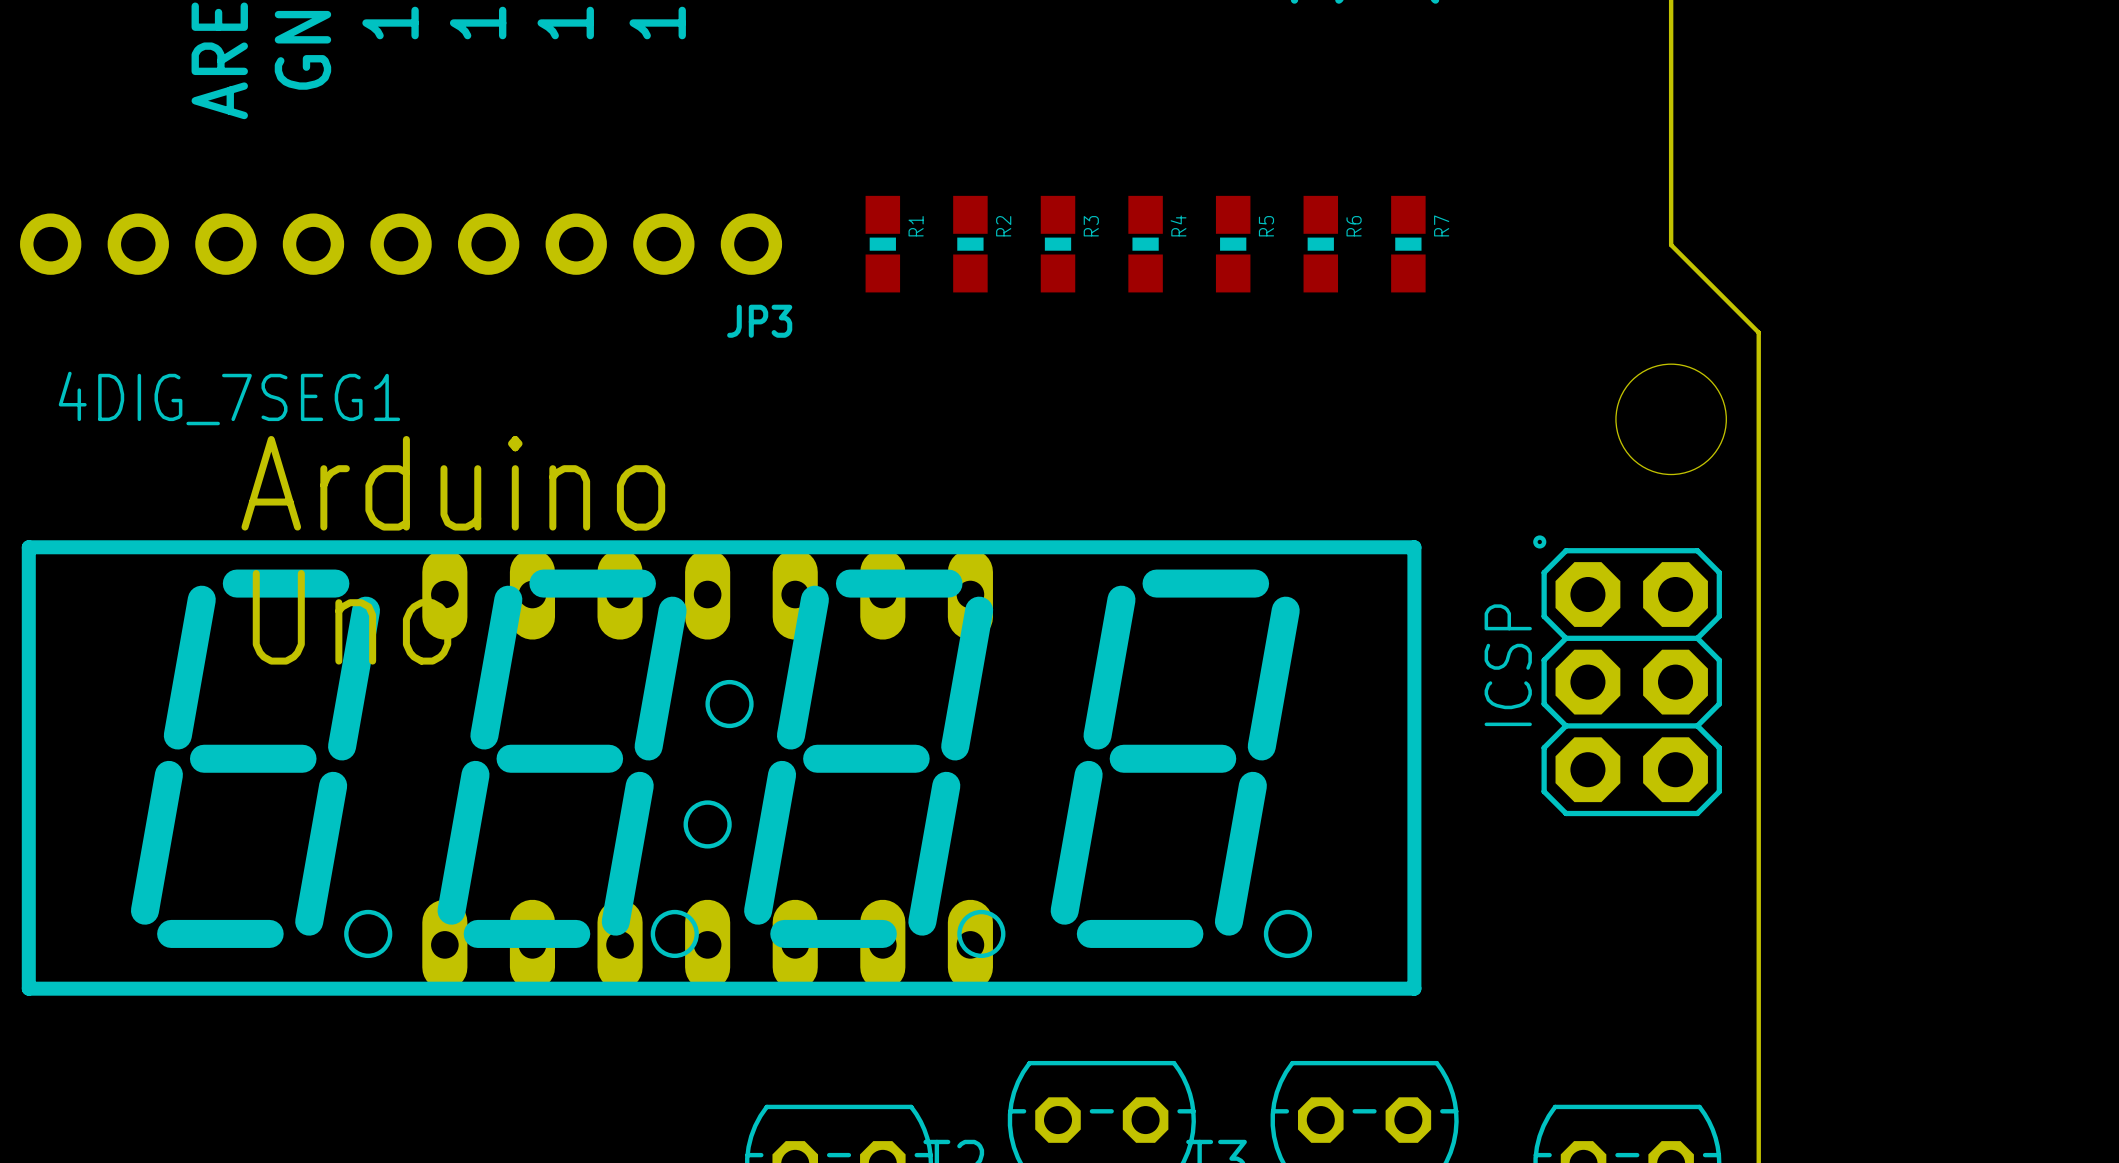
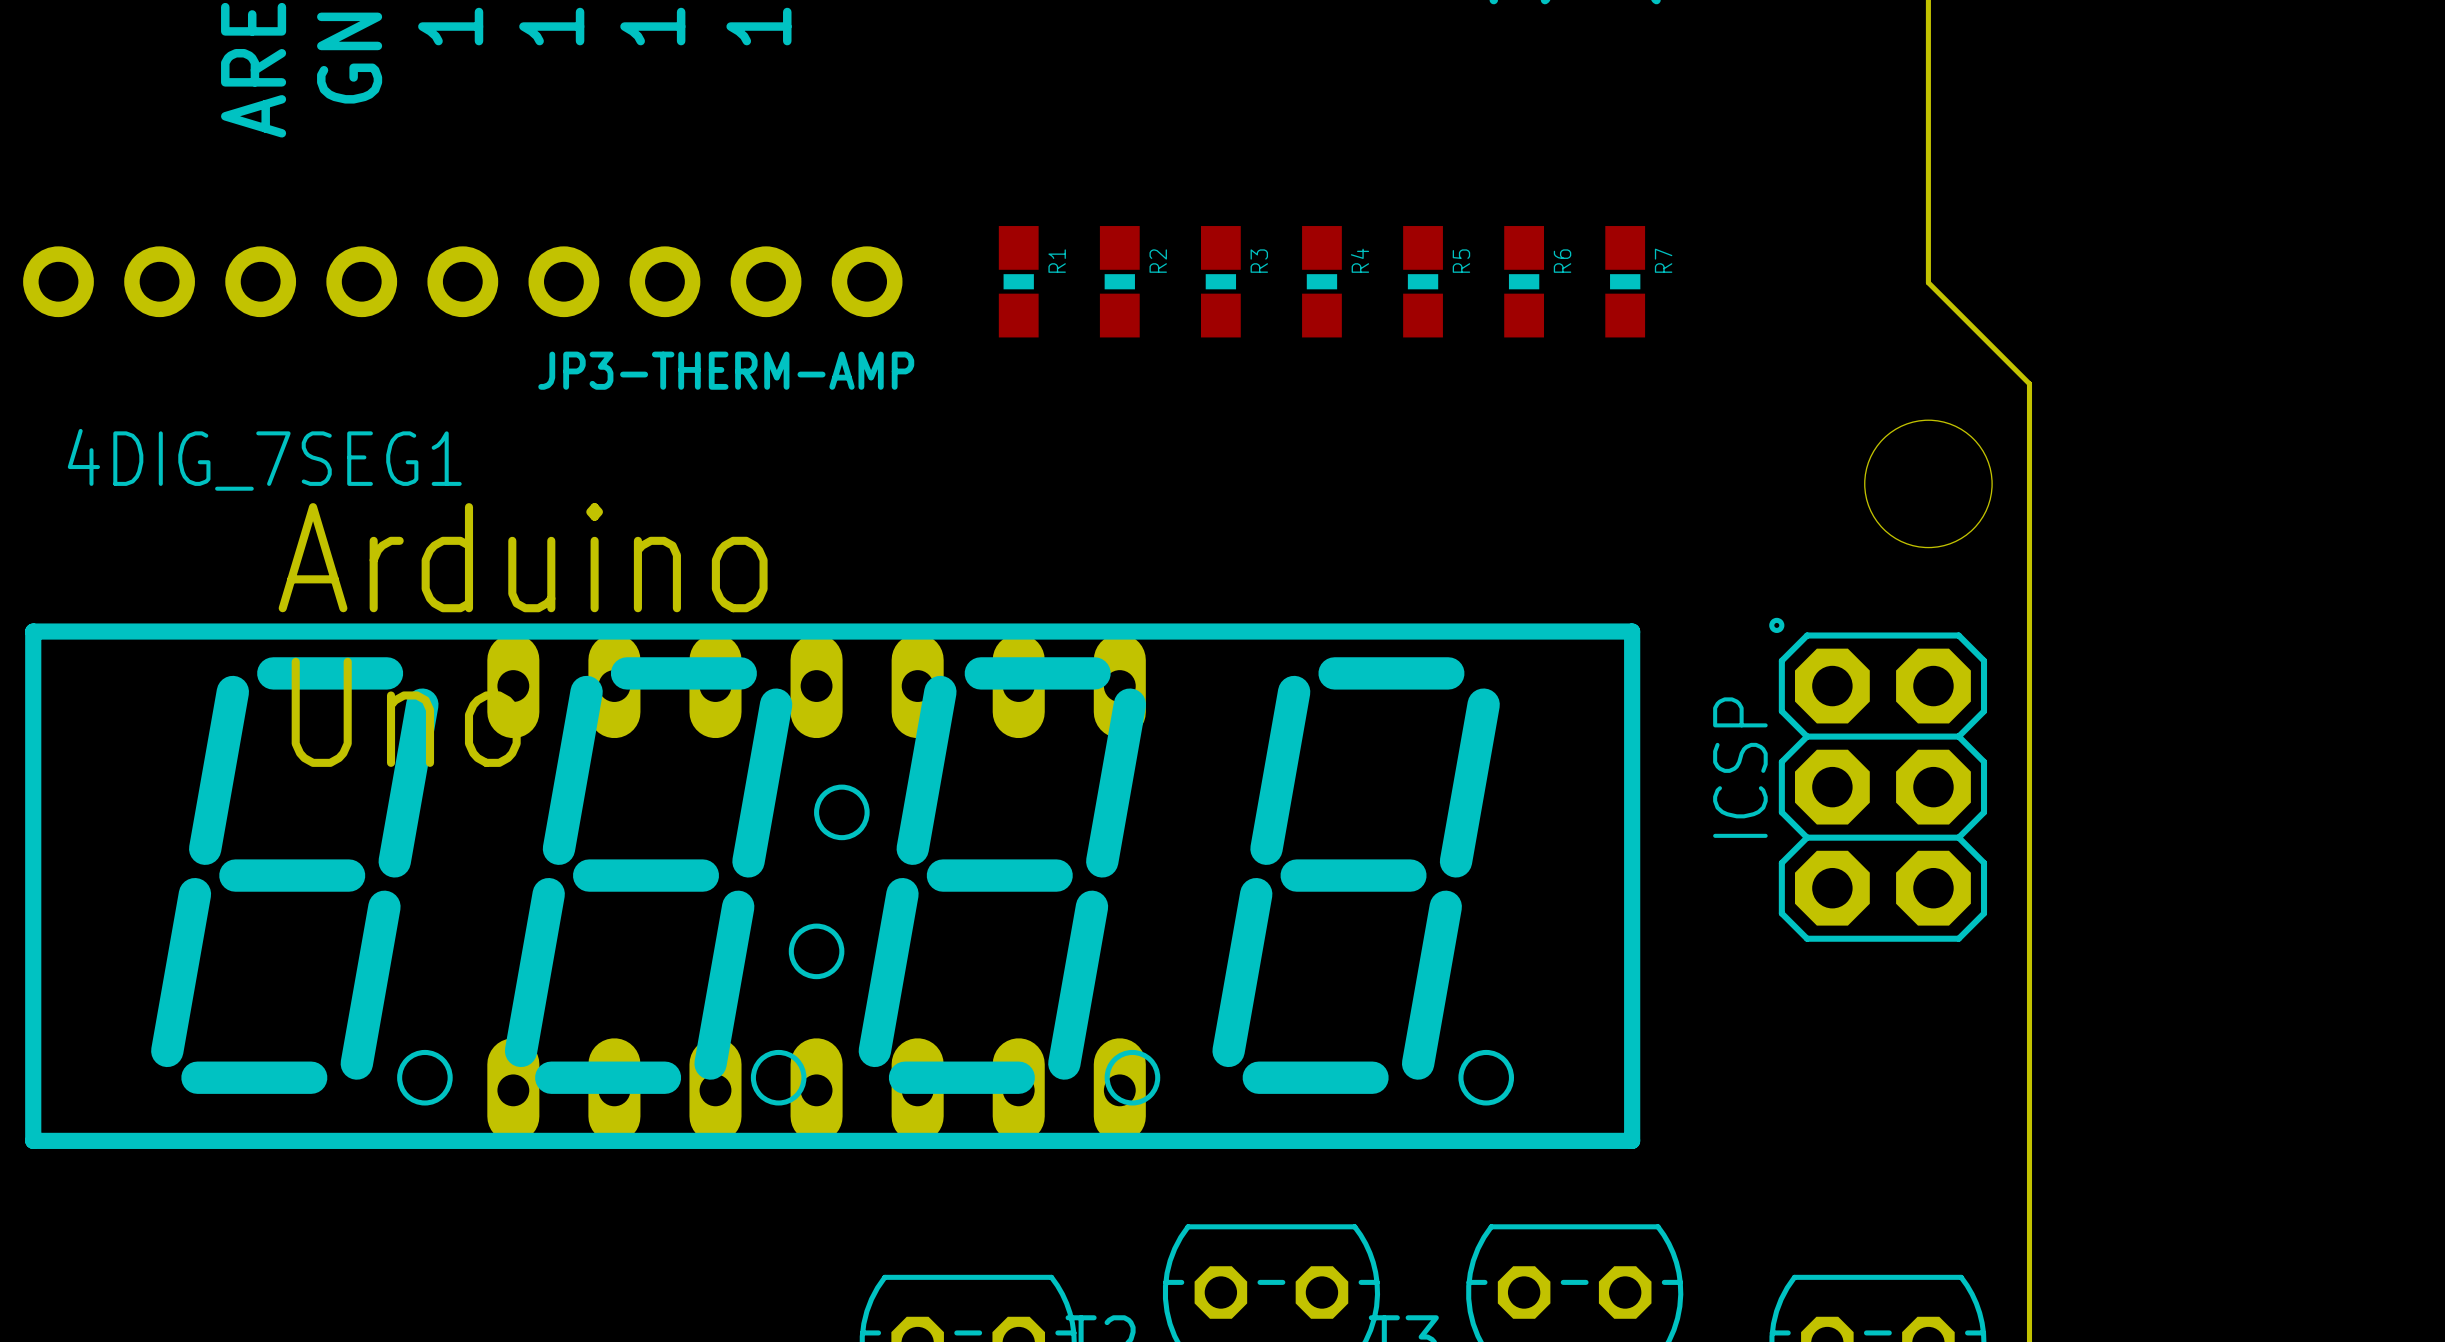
JP3 name: JP3 (759, 321) -> JP3-THERM-AMP (726, 370)

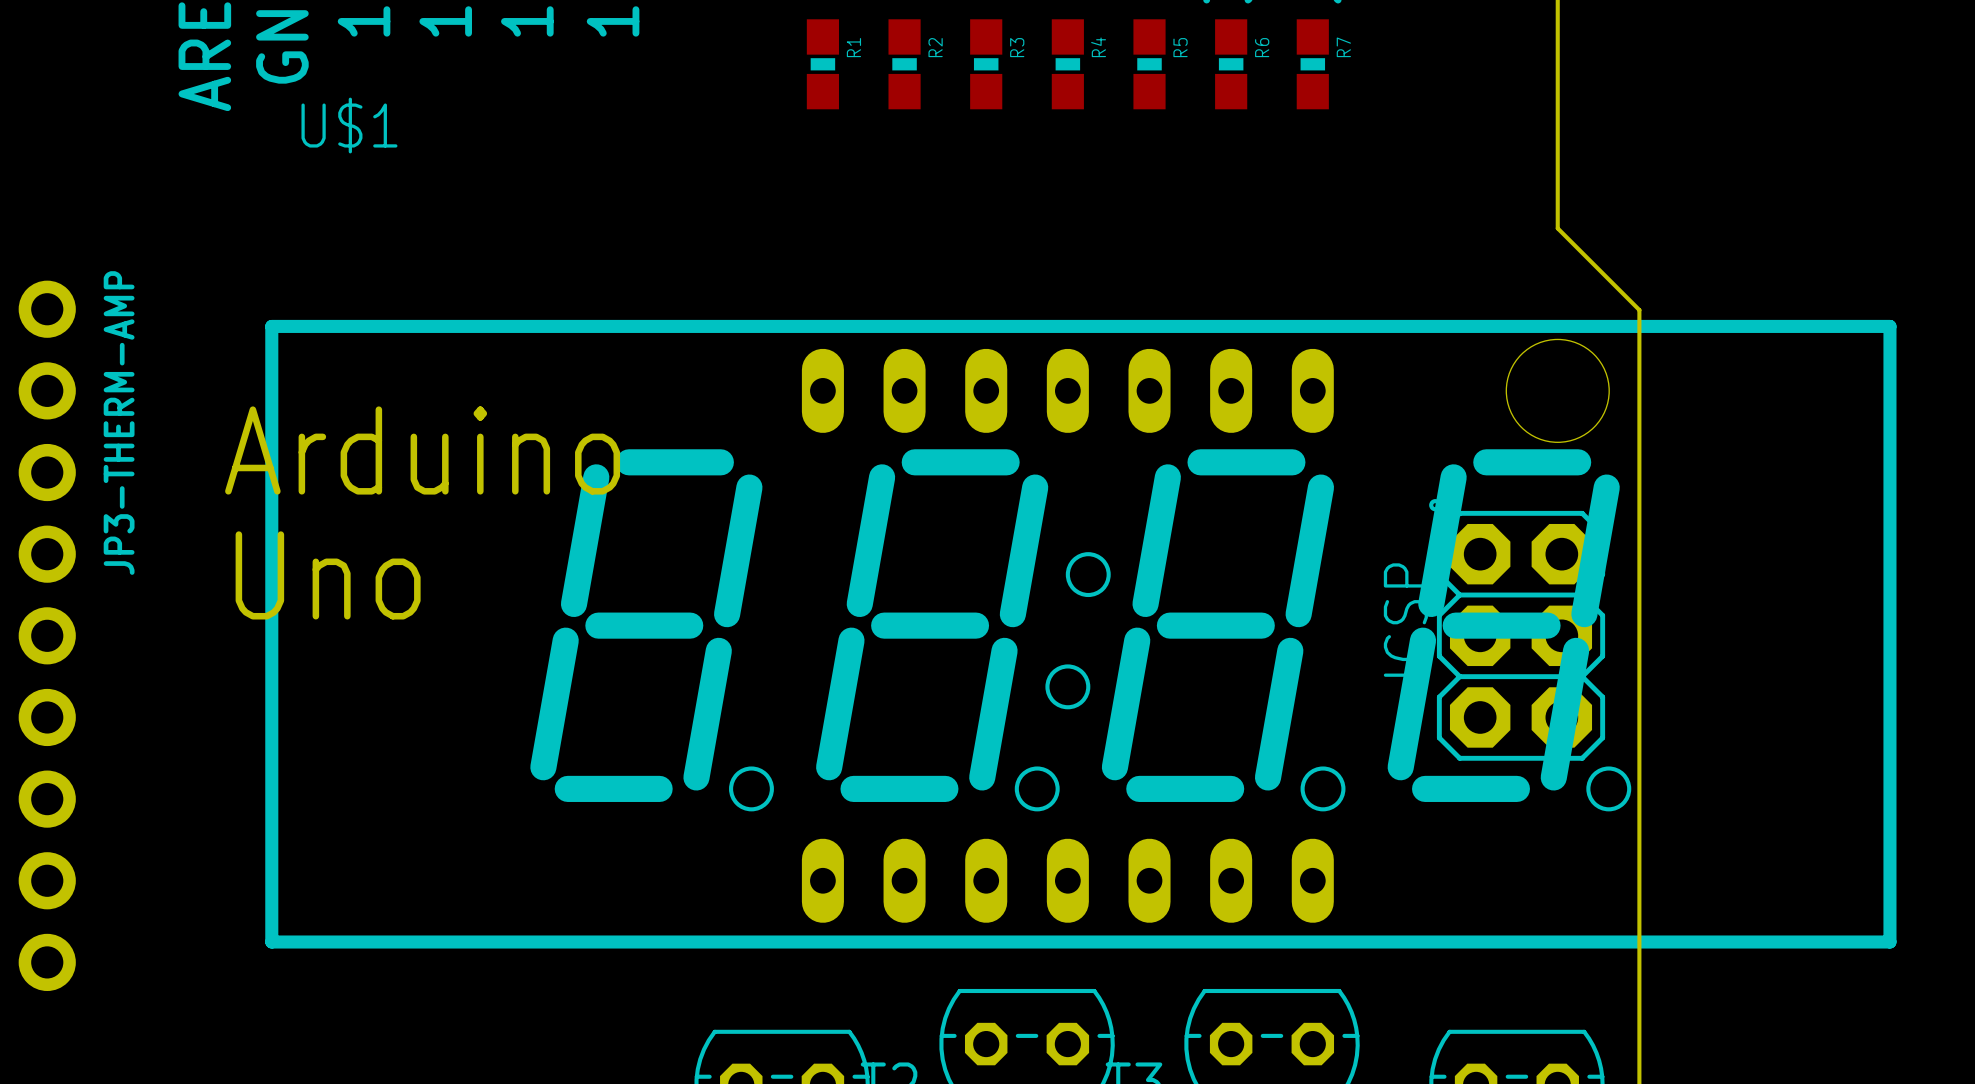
JP3-THERM-AMP rotation: 0° (462, 281) -> 90° clockwise (47, 635)
JP3-THERM-AMP position: (462, 281) -> (47, 635)
R1 position: (1018, 281) -> (822, 64)
R2 position: (1119, 281) -> (904, 64)
R3 position: (1220, 281) -> (986, 64)
R4 position: (1321, 281) -> (1067, 64)
R5 position: (1423, 281) -> (1149, 64)
R6 position: (1524, 281) -> (1231, 64)
R7 position: (1625, 281) -> (1312, 64)
JP3-THERM-AMP name position: JP3-THERM-AMP (726, 370) -> JP3-THERM-AMP (119, 423)
U$1: none -> (1080, 634)
4DIG_7SEG1: (832, 886) -> none

